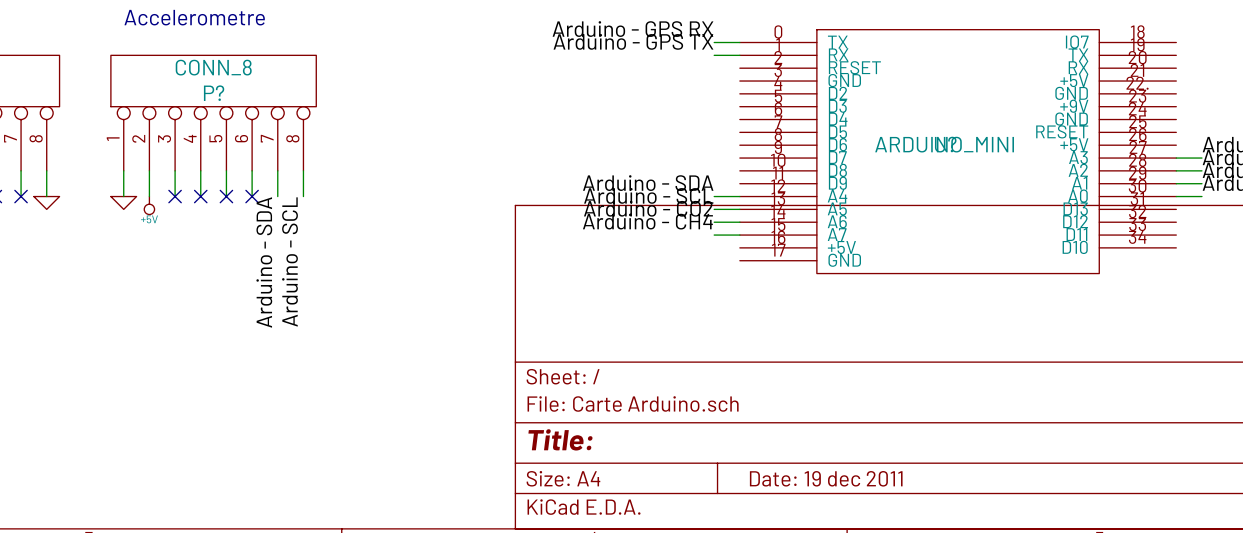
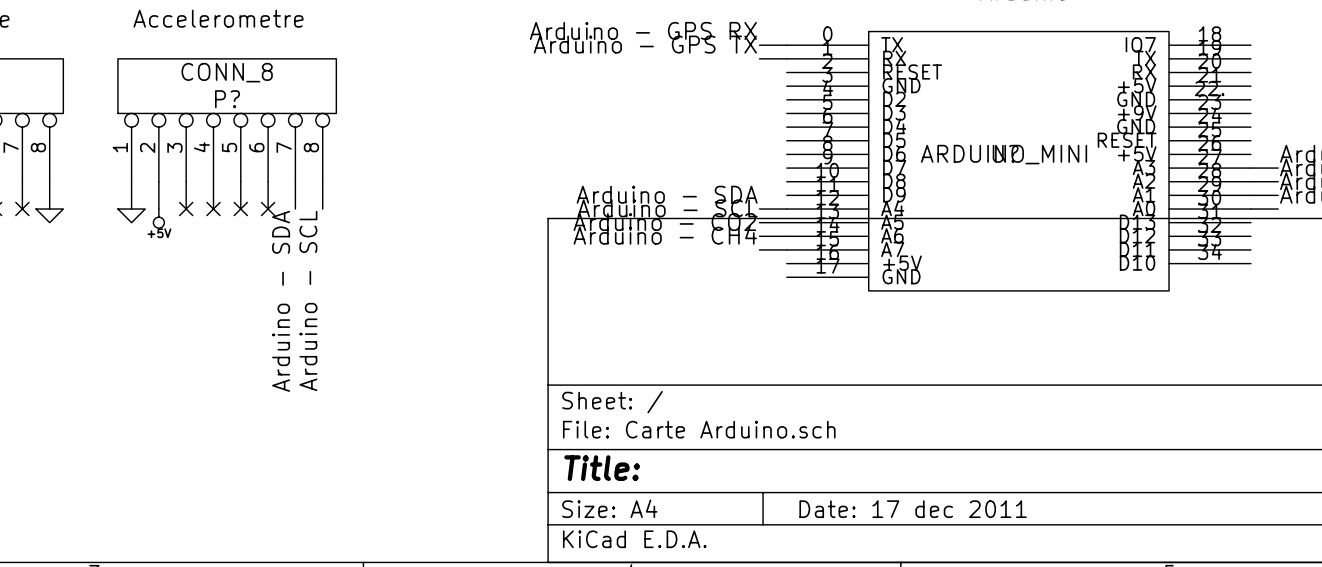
title block: Date: 19 dec 2011 (826, 478) -> Date: 17 dec 2011 (913, 509)

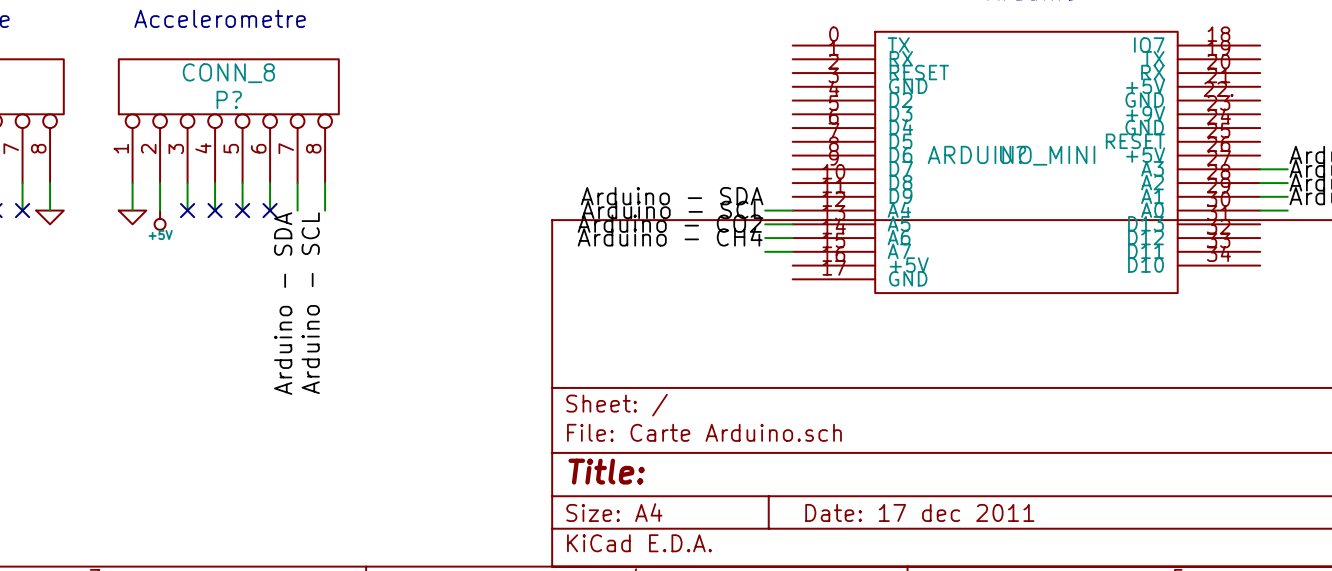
label: Arduino - GPS RX (643, 30) -> none
label: Arduino - GPS TX (645, 44) -> none
wire: (759, 45) (786, 45) -> none
wire: (759, 58) (786, 58) -> none

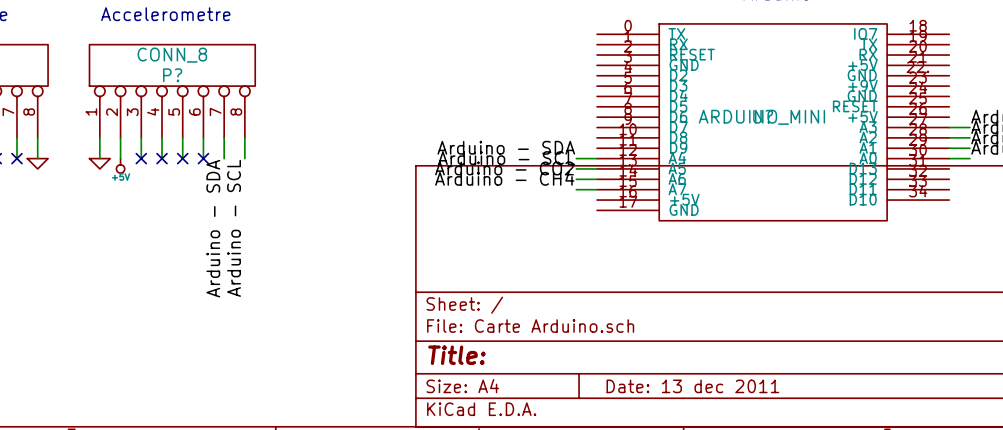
title block: Date: 17 dec 2011 (919, 512) -> Date: 13 dec 2011 (692, 386)

